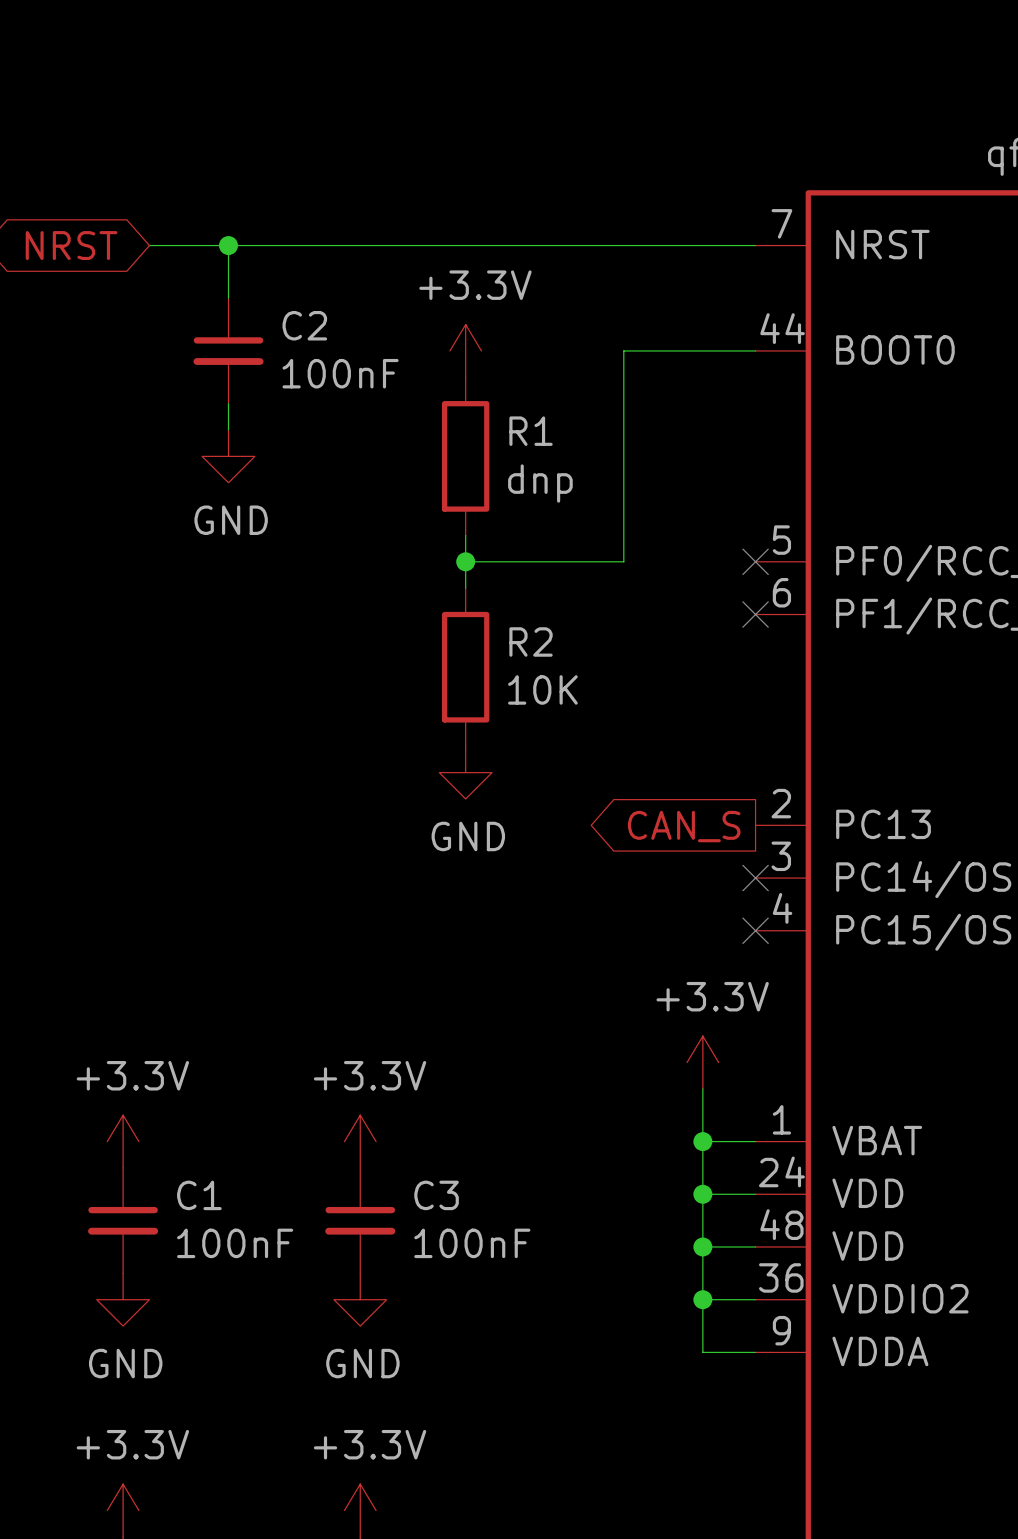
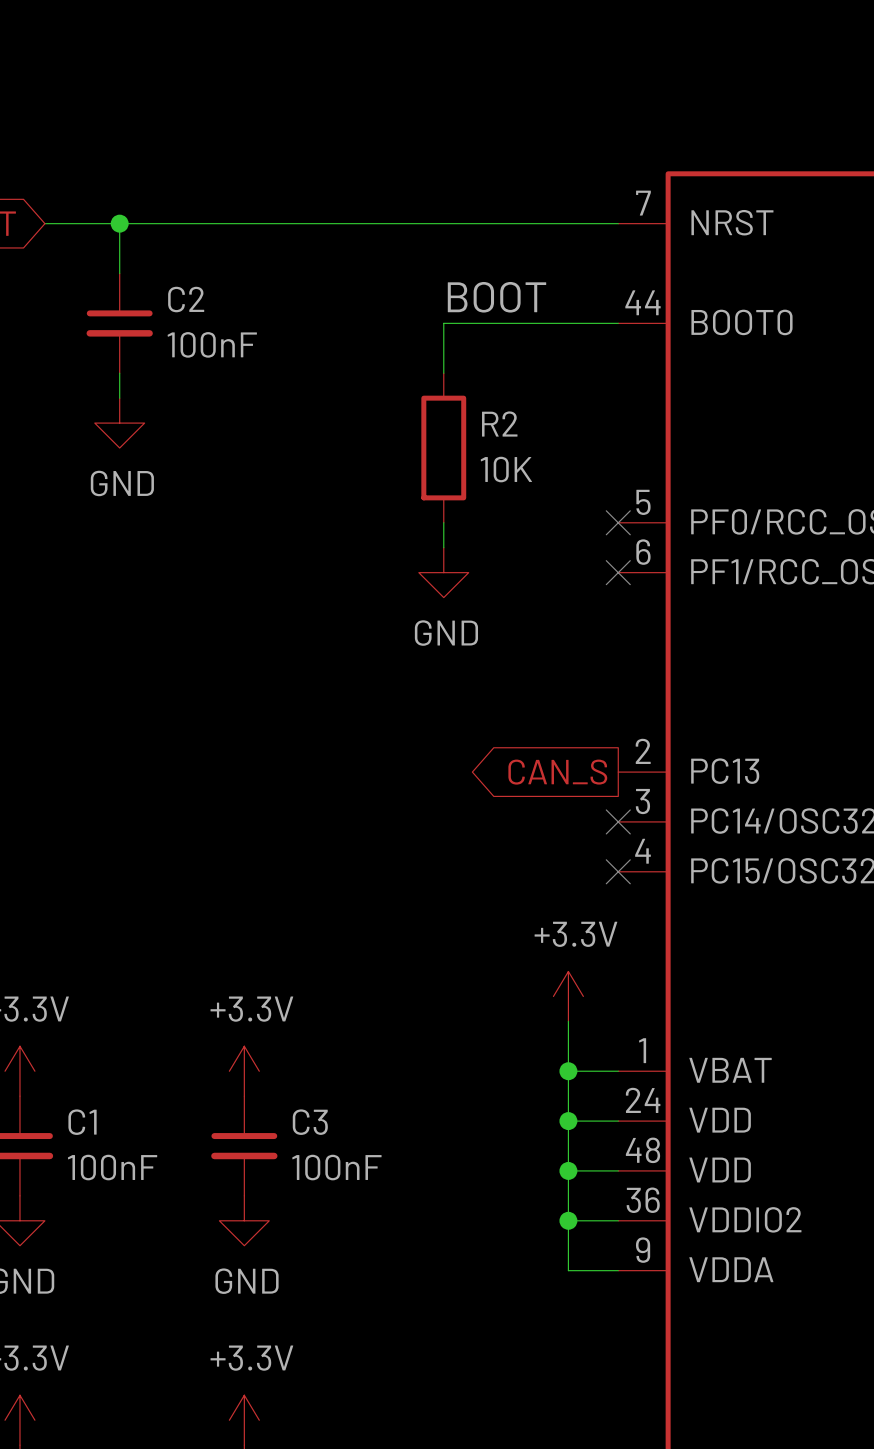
label: none -> BOOT (497, 297)
power symbol: +3.3V (465, 350) -> none
wire: (623, 350) (623, 561) (465, 561) -> (493, 323) (443, 323) (443, 373)
R1: dnp (465, 456) -> none
wire: (465, 535) (465, 588) -> none
junction: (465, 561) -> none
wire: none -> (443, 522) (443, 547)
R2 position: (465, 667) -> (443, 448)
power symbol position: GND (465, 772) -> GND (443, 572)

